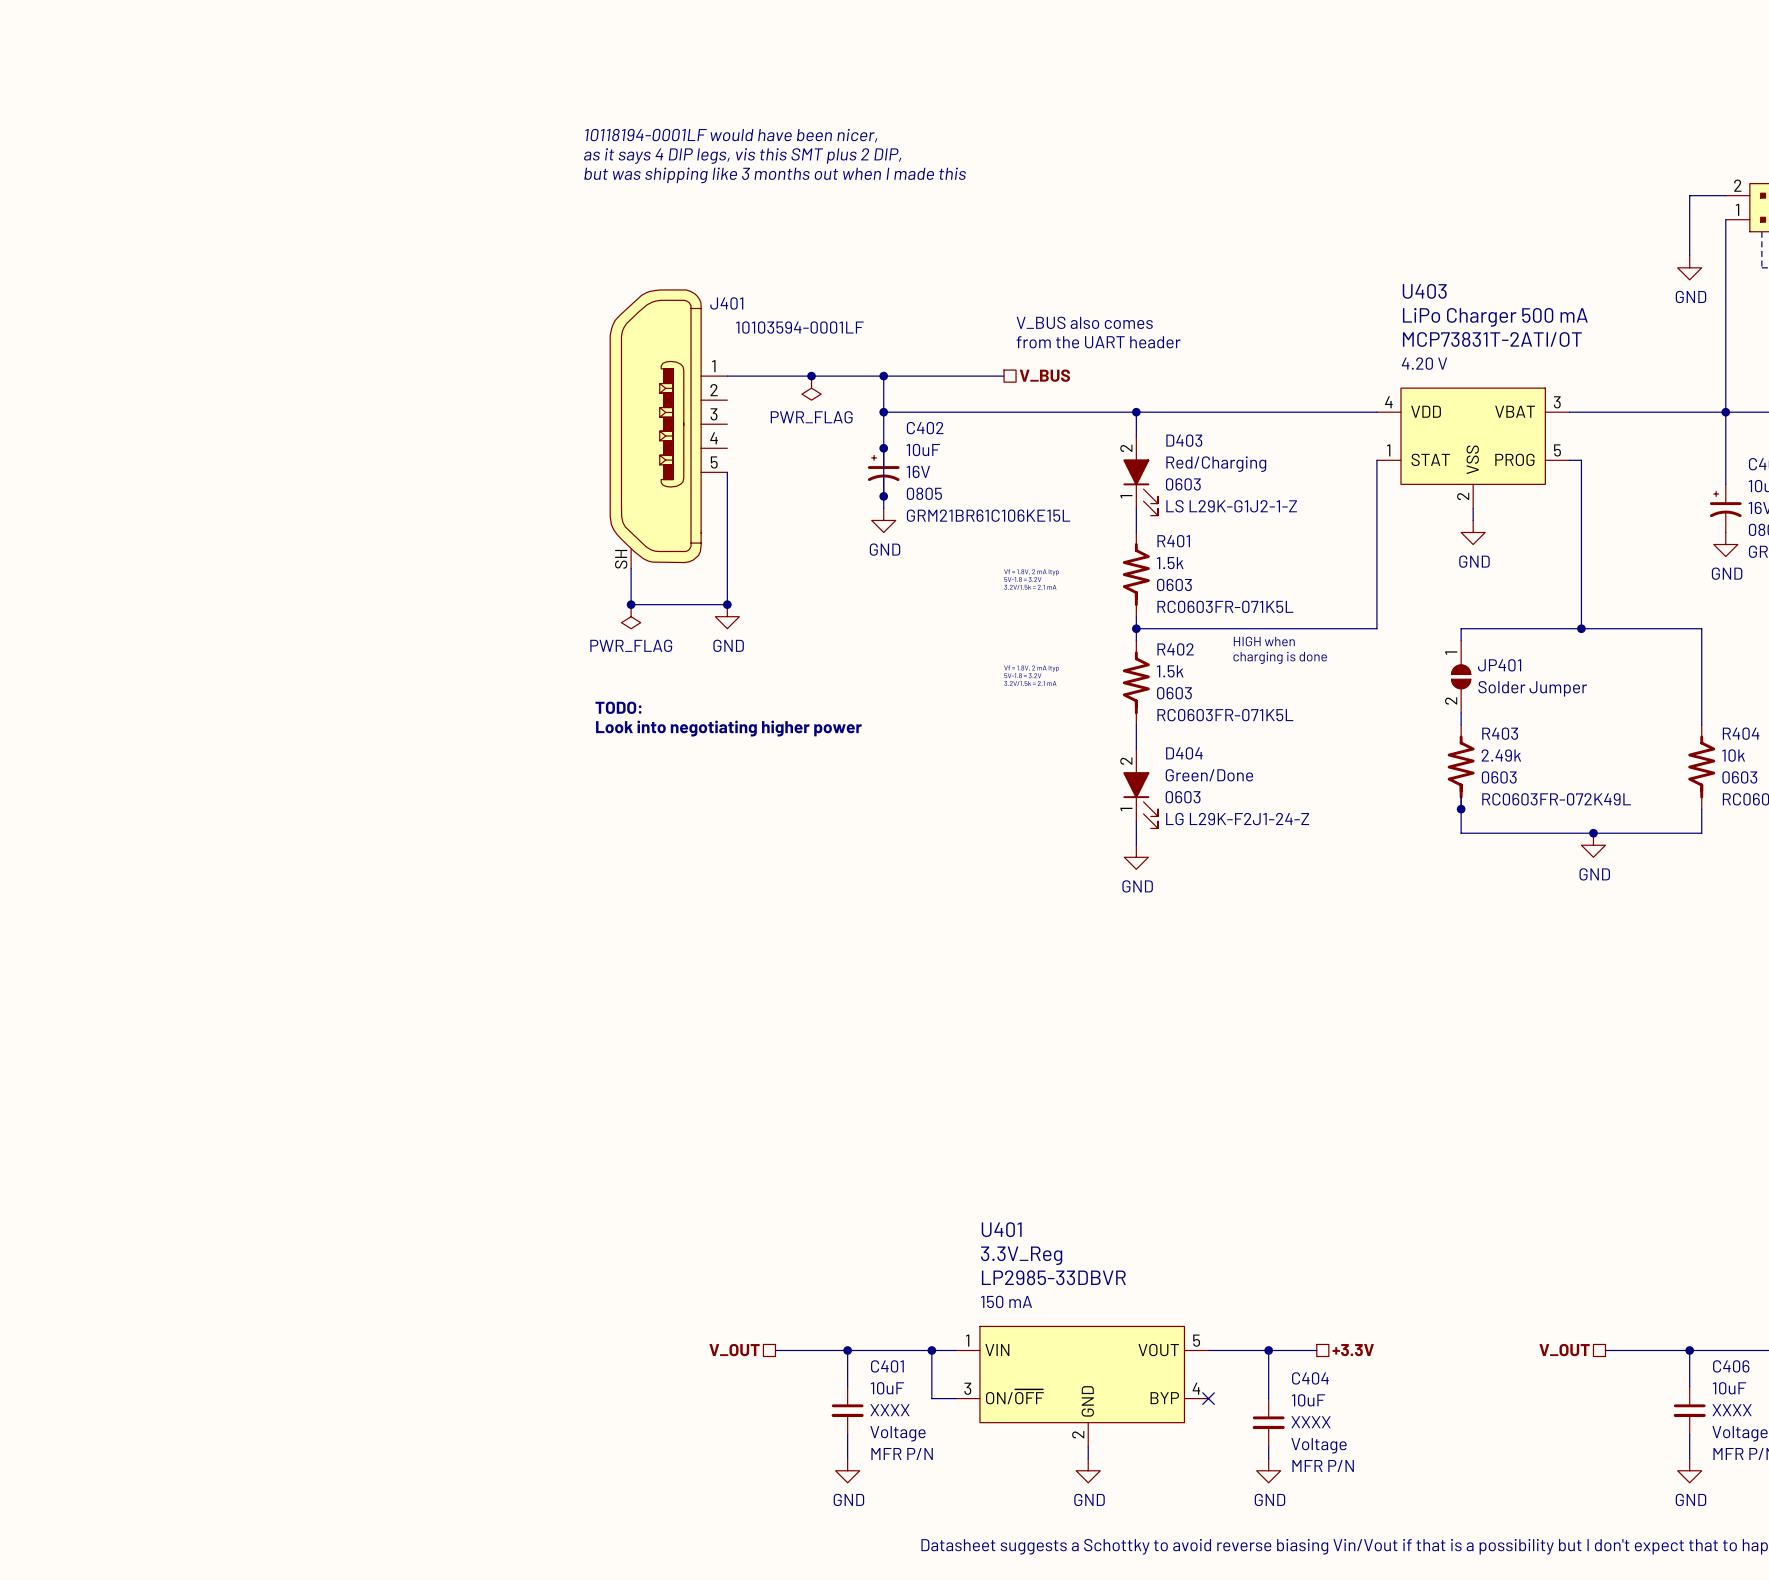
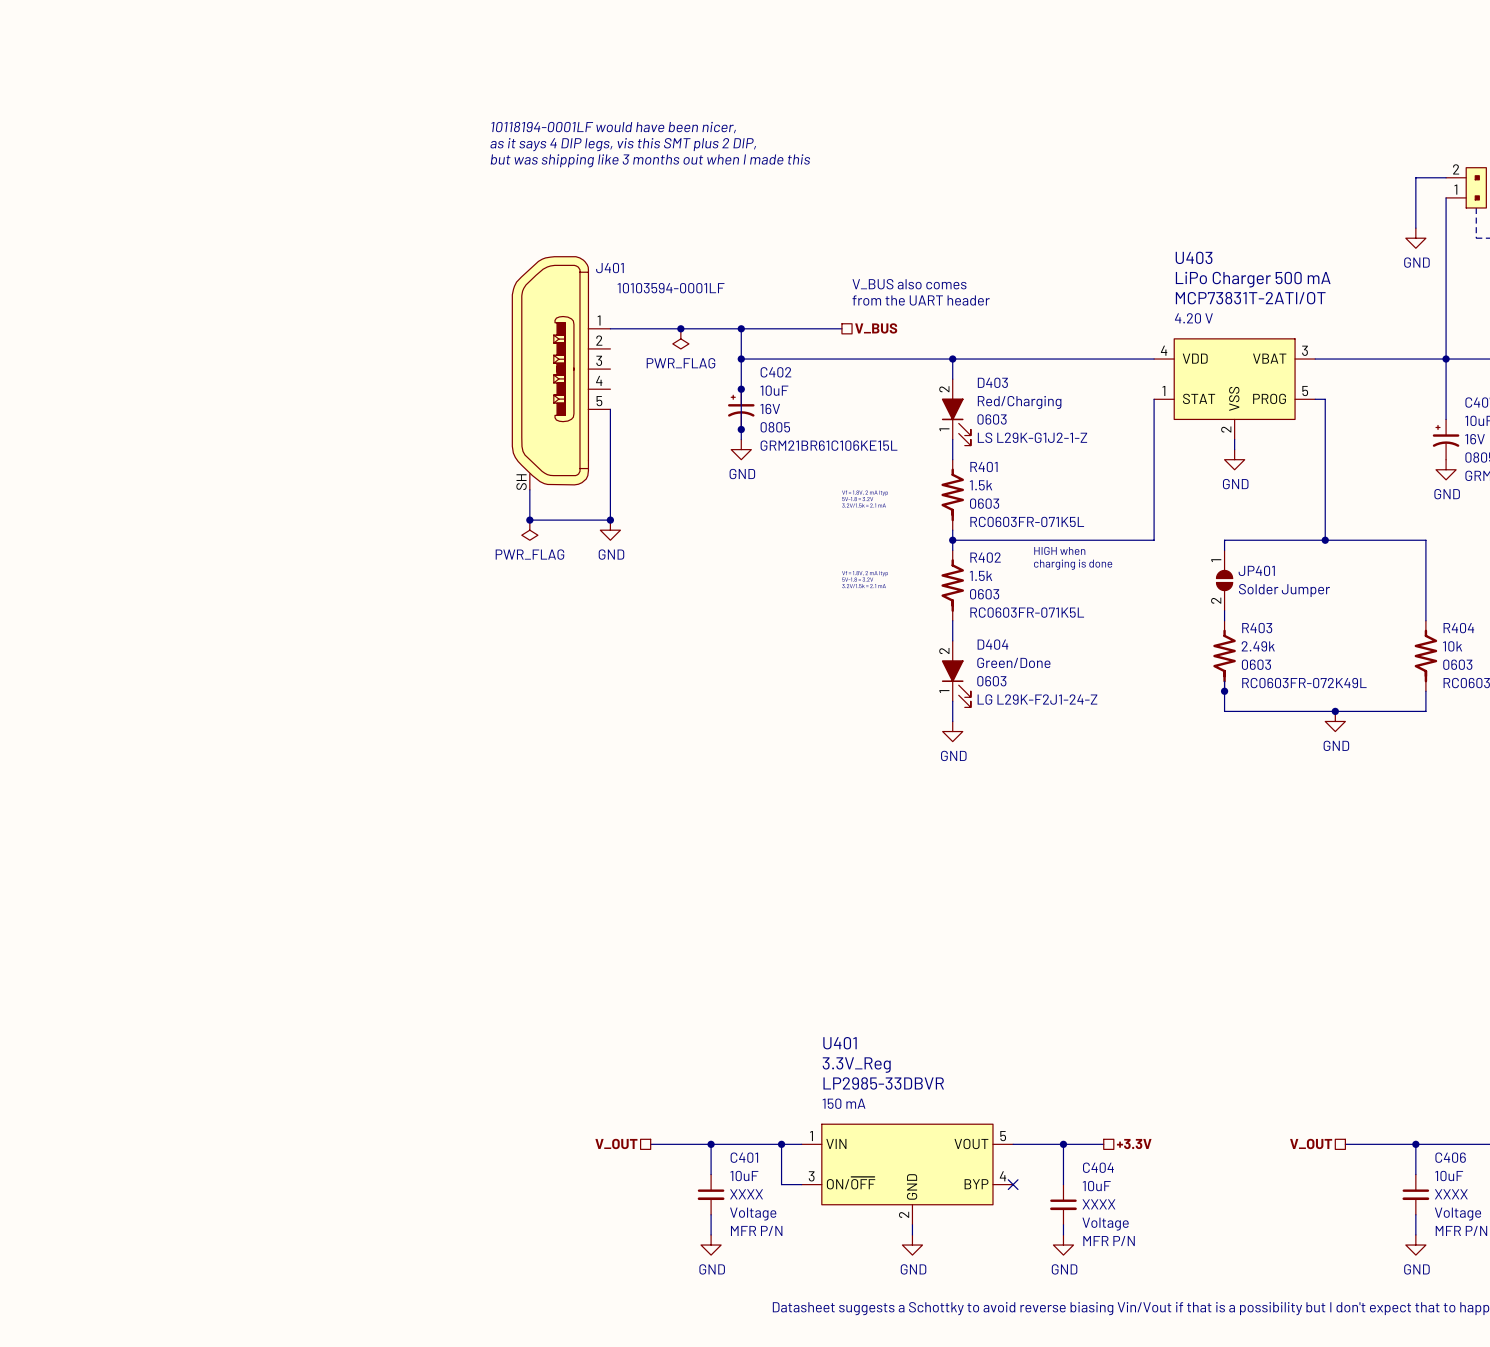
text: TODO: (618, 707) -> none
text: Look into negotiating higher power (728, 728) -> none

